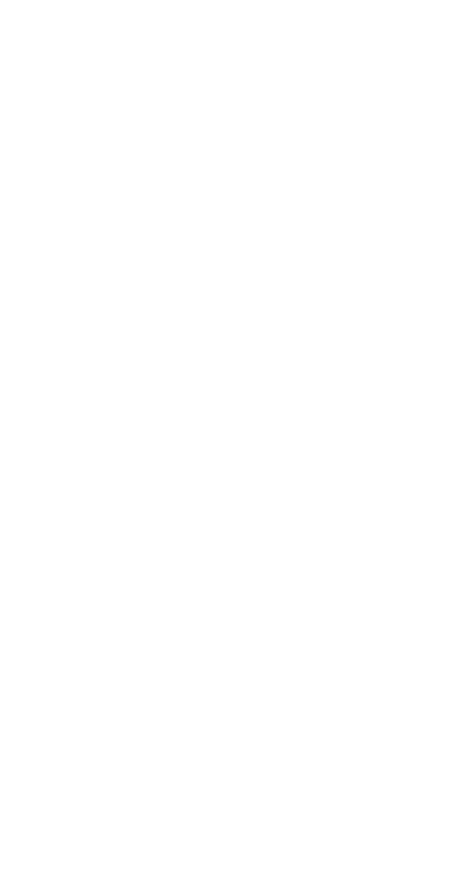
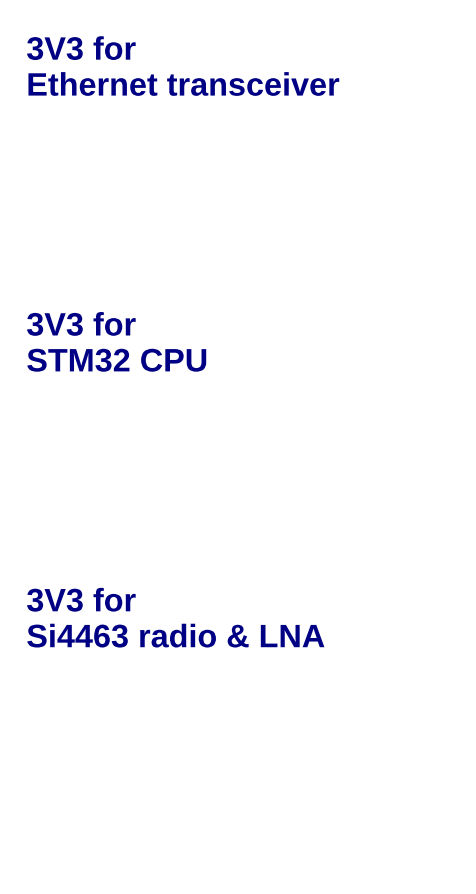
text: none -> 3V3 for (81, 48)
text: none -> Ethernet transceiver (183, 84)
text: none -> 3V3 for (81, 323)
text: none -> STM32 CPU (116, 360)
text: none -> 3V3 for (81, 599)
text: none -> Si4463 radio & LNA (175, 635)

